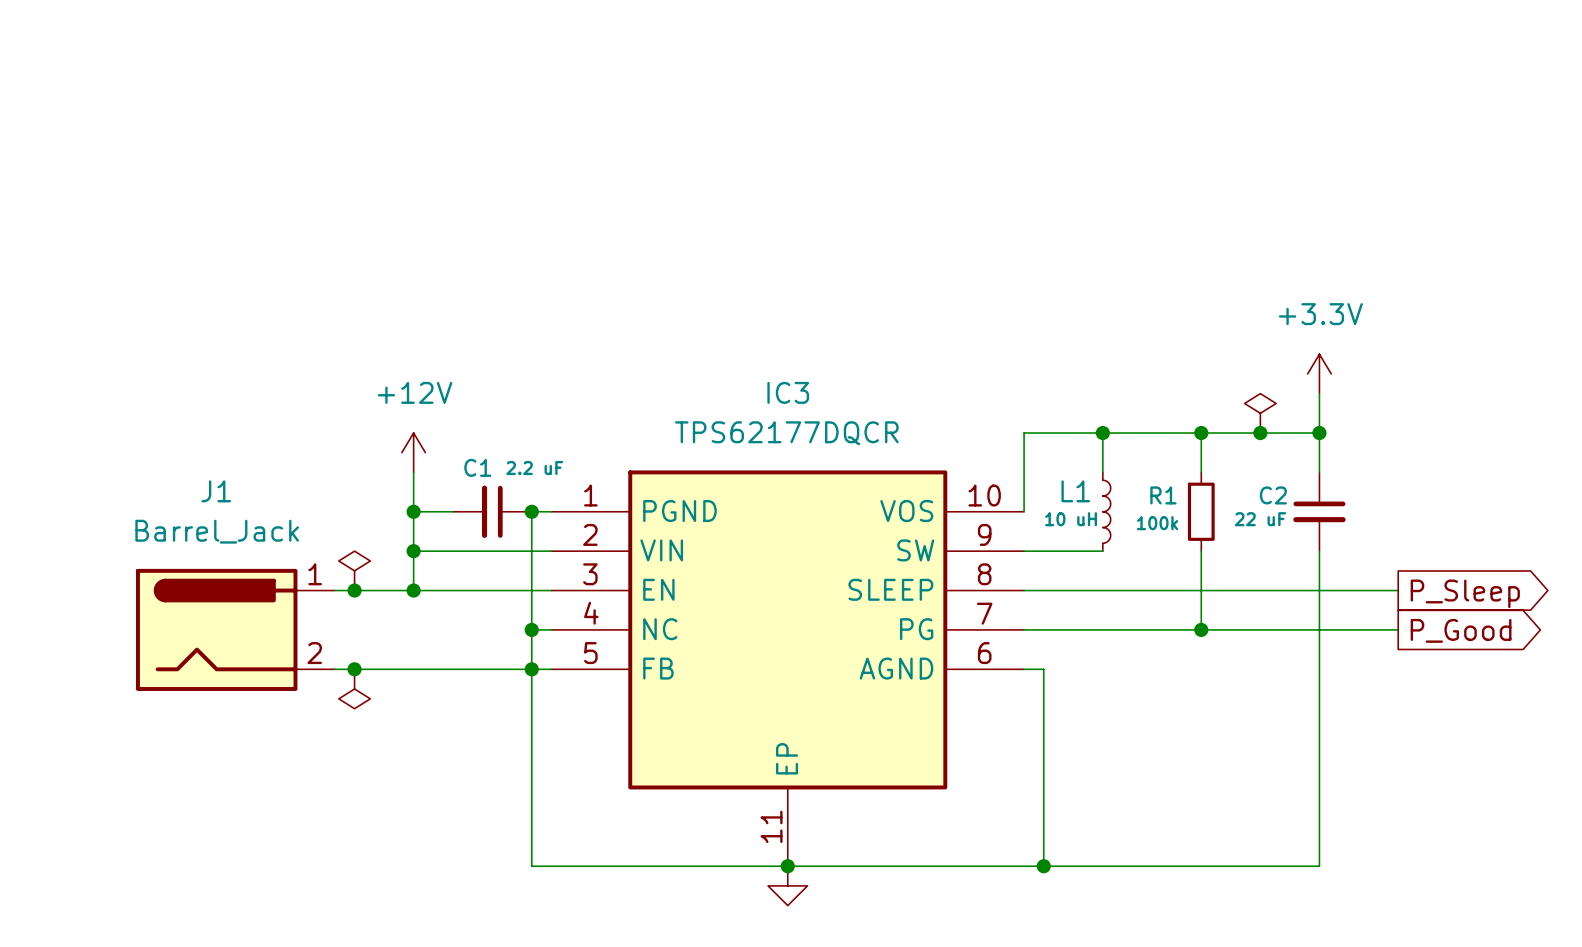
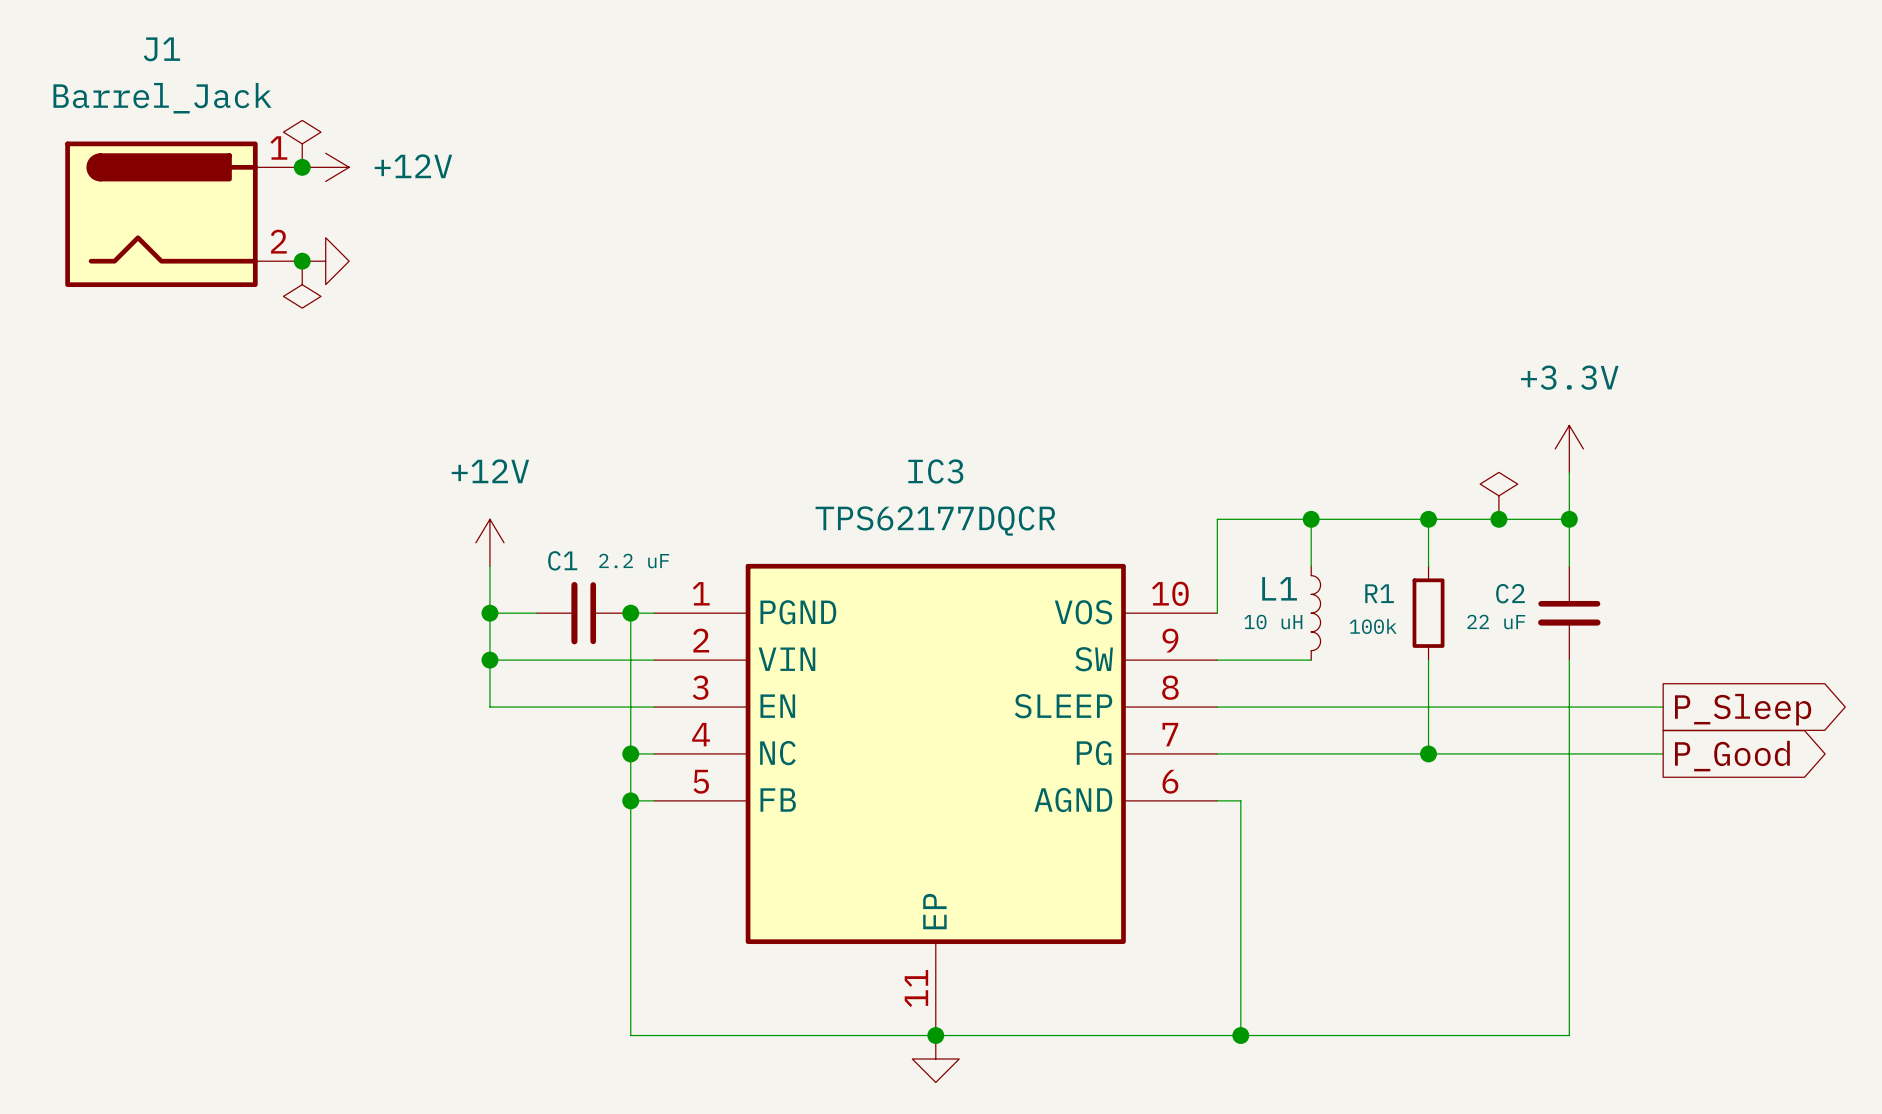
power symbol: none -> (302, 143)
junction: none -> (302, 167)
power symbol: none -> +12V (325, 167)
junction: none -> (302, 261)
power symbol: none -> (325, 261)
power symbol: none -> (302, 284)
power symbol: (354, 570) -> none
wire: (334, 590) (413, 590) -> none
junction: (354, 590) -> none
junction: (413, 590) -> none
J1 position: (235, 629) -> (183, 214)
wire: (334, 669) (531, 669) -> none
junction: (354, 669) -> none
power symbol: (354, 689) -> none

